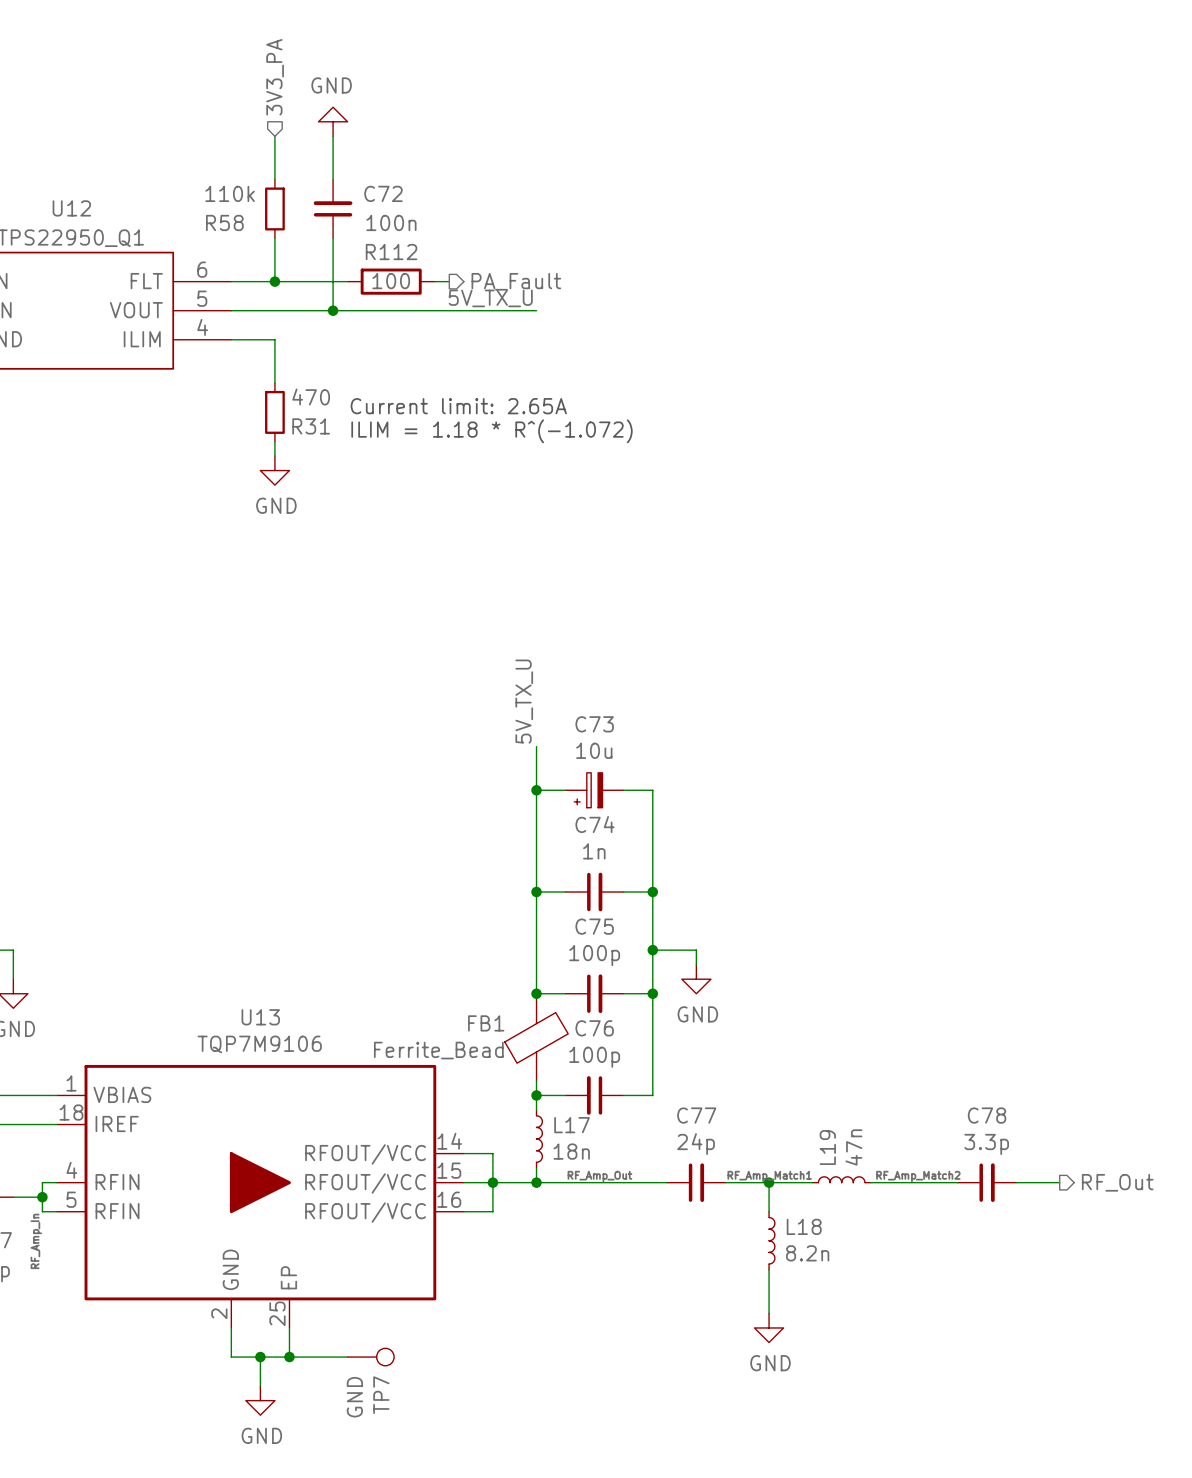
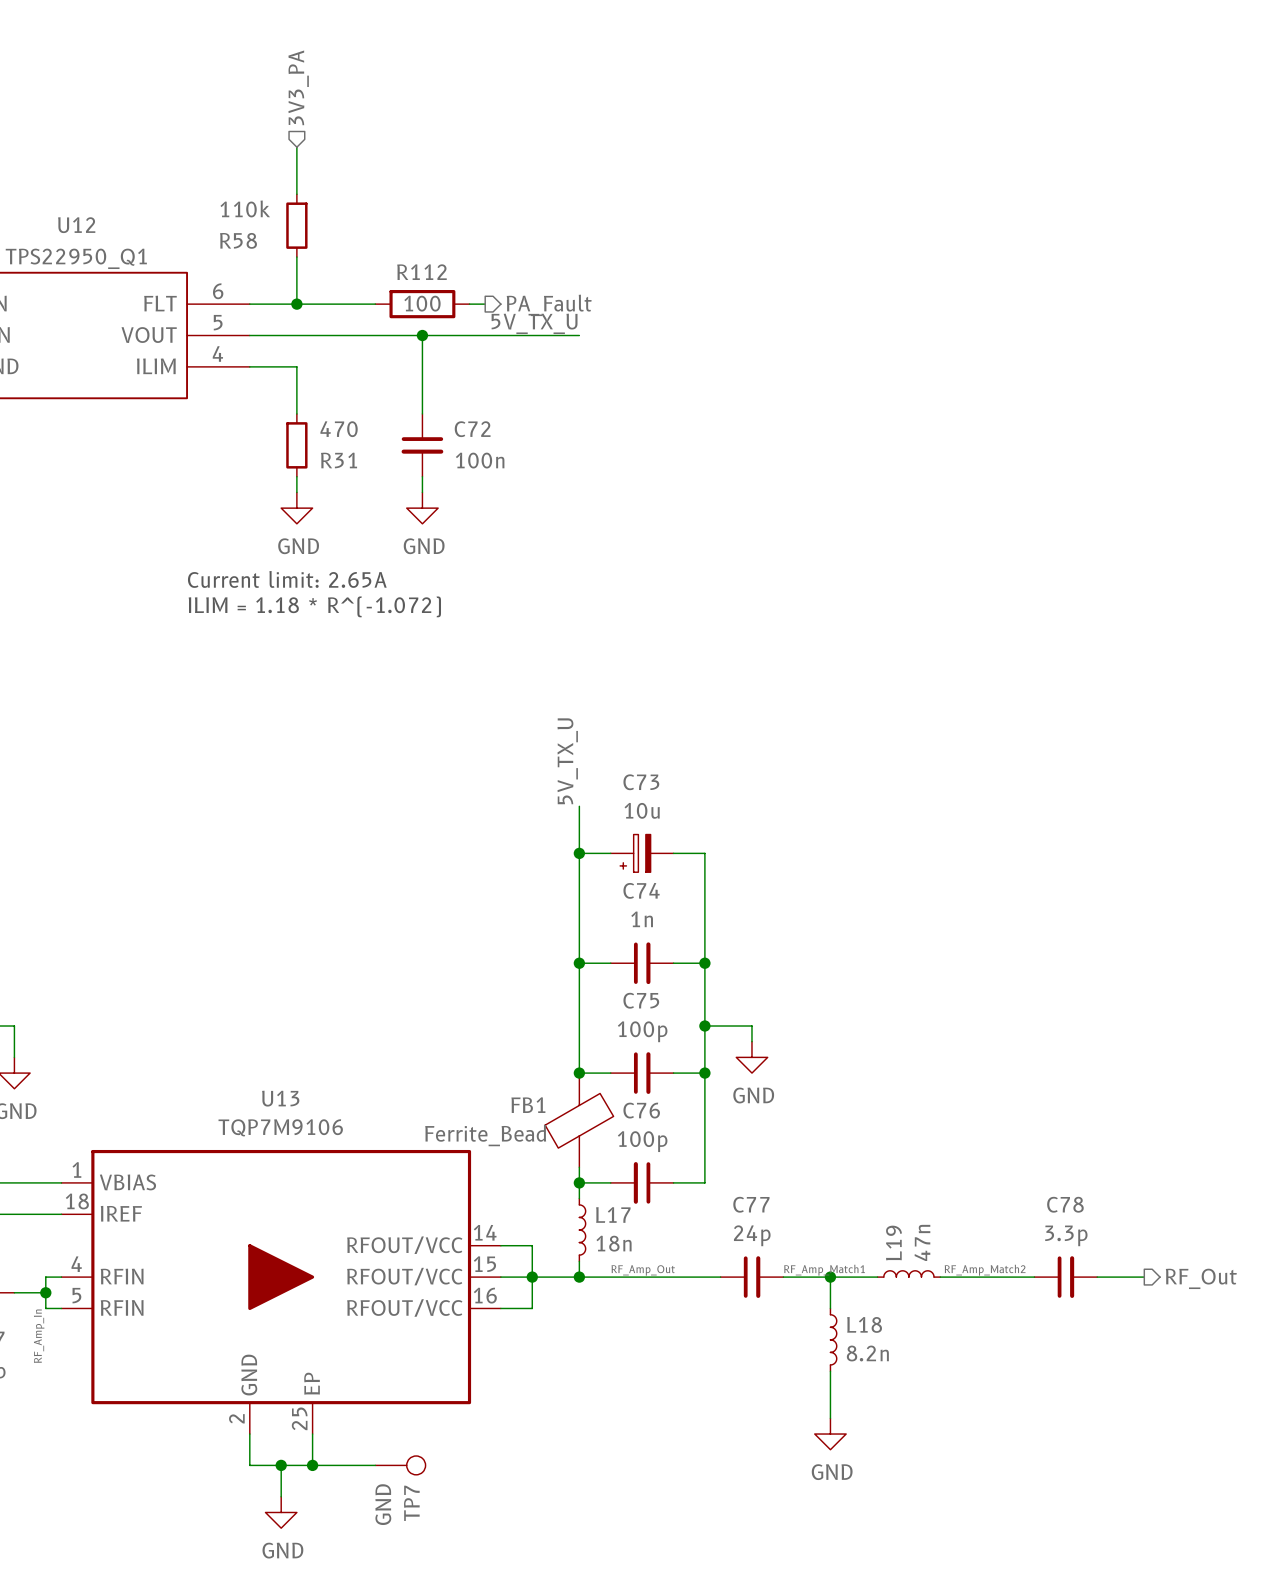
power symbol: GND (333, 121) -> none
wire: (333, 136) (333, 179) -> none
C72 rotation: 0° (333, 208) -> 180° (422, 445)
C72 position: (333, 208) -> (422, 445)
wire: (333, 238) (333, 310) -> (422, 335) (422, 413)
junction position: (333, 310) -> (422, 335)
text position: Current limit: 2.65A (458, 406) -> Current limit: 2.65A (287, 579)
text position: ILIM = 1.18 * R^(-1.072) (491, 431) -> ILIM = 1.18 * R^(-1.072) (314, 606)
wire: none -> (422, 476) (422, 492)
power symbol: none -> GND (422, 508)

